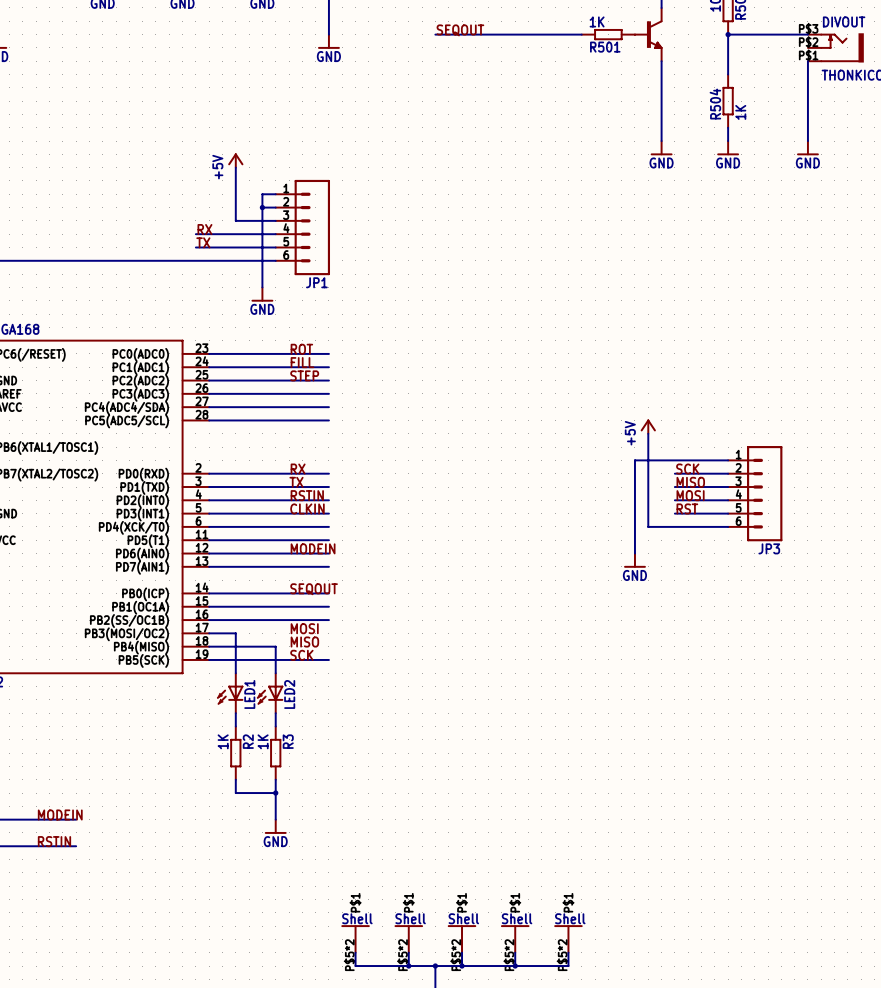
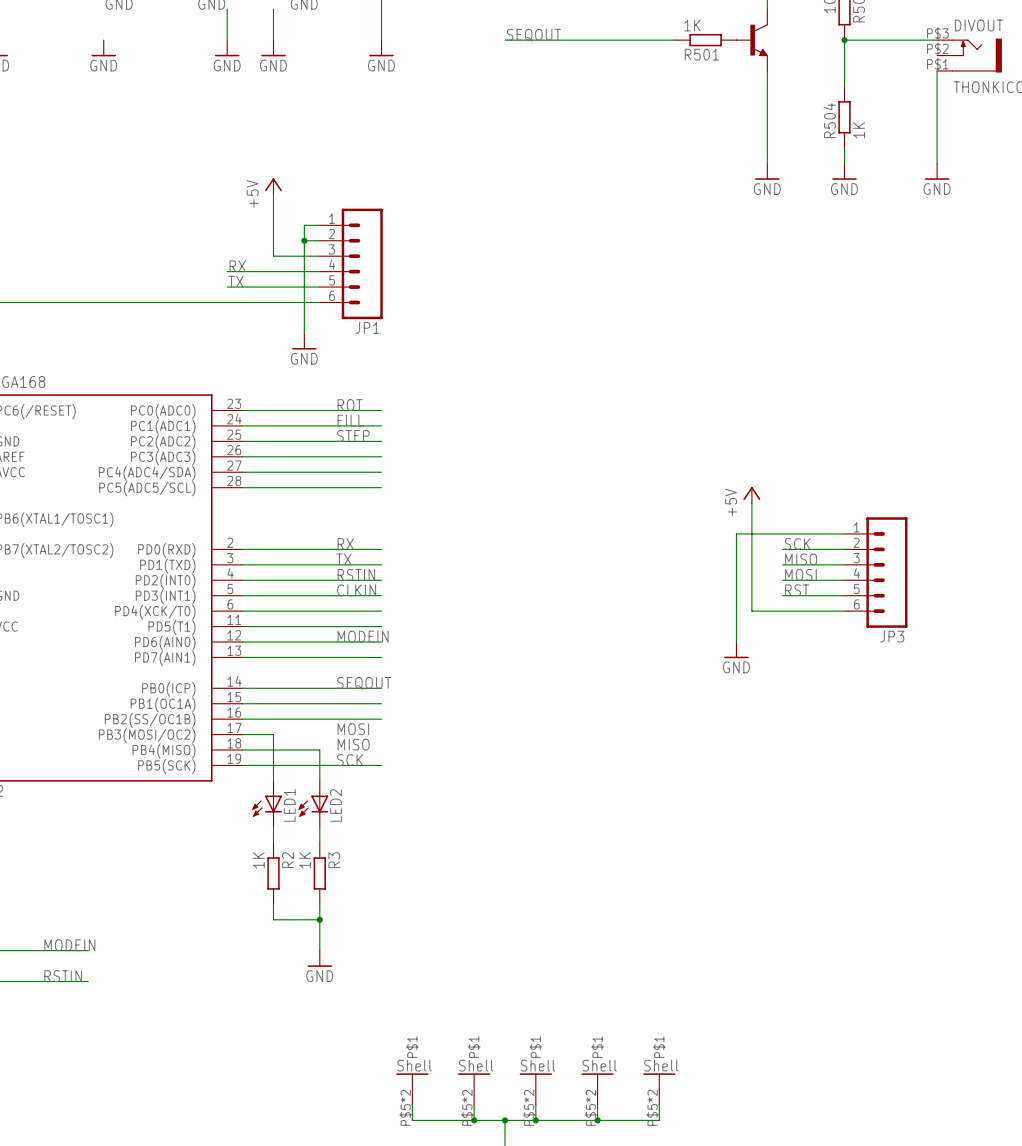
wire: none -> (227, 9) (227, 40)
wire: none -> (273, 9) (273, 40)
power symbol: none -> GND (103, 48)
power symbol: none -> GND (227, 48)
power symbol: none -> GND (273, 48)

